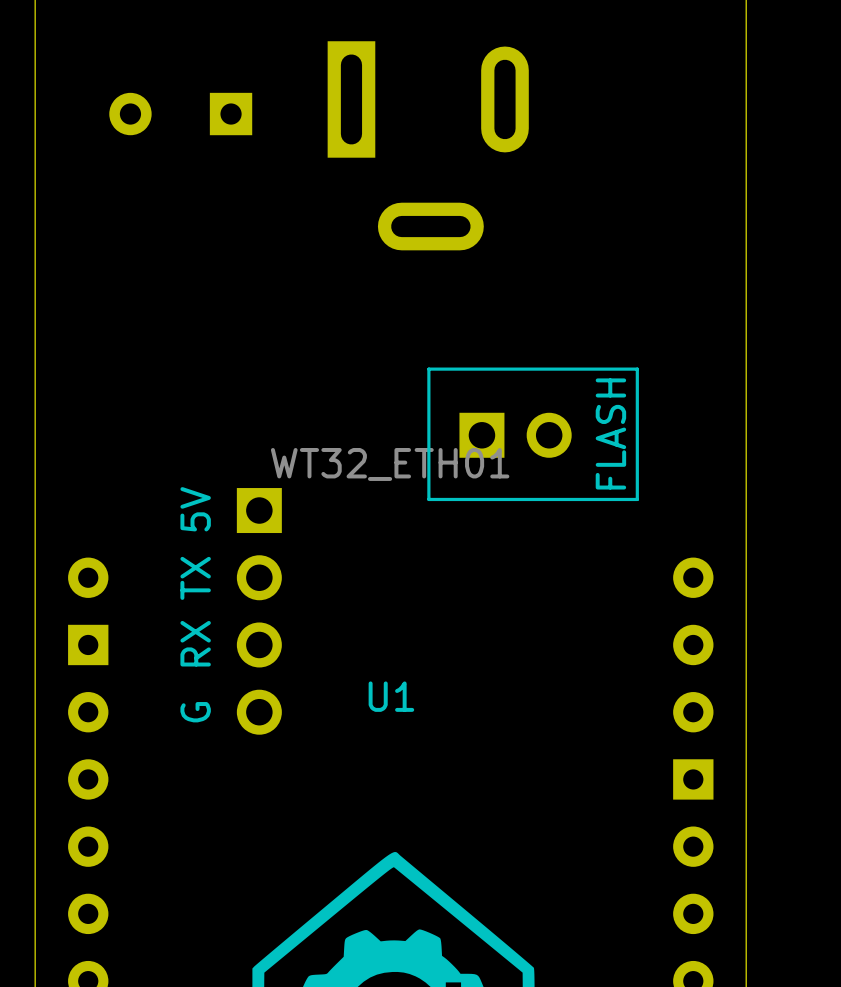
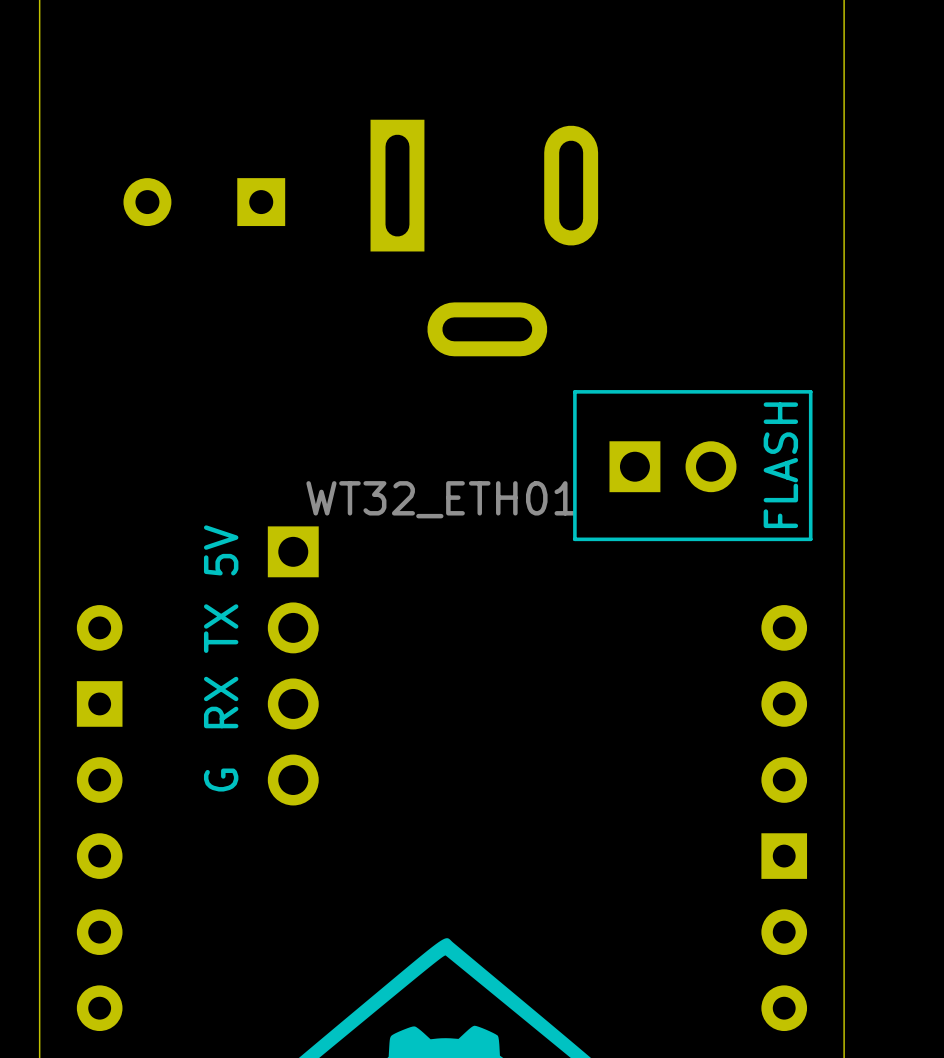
part position: (180, 114) -> (204, 202)
part position: (428, 145) -> (484, 238)
line: (508, 369) (428, 369) (428, 499) (508, 499) -> (574, 391) (574, 539)
line: (637, 369) (637, 499) -> (720, 391) (810, 391) (810, 539) (720, 539)
text position: FLASH (610, 433) -> FLASH (780, 465)
part position: (515, 435) -> (672, 466)
U1 name: U1 (391, 696) -> none

